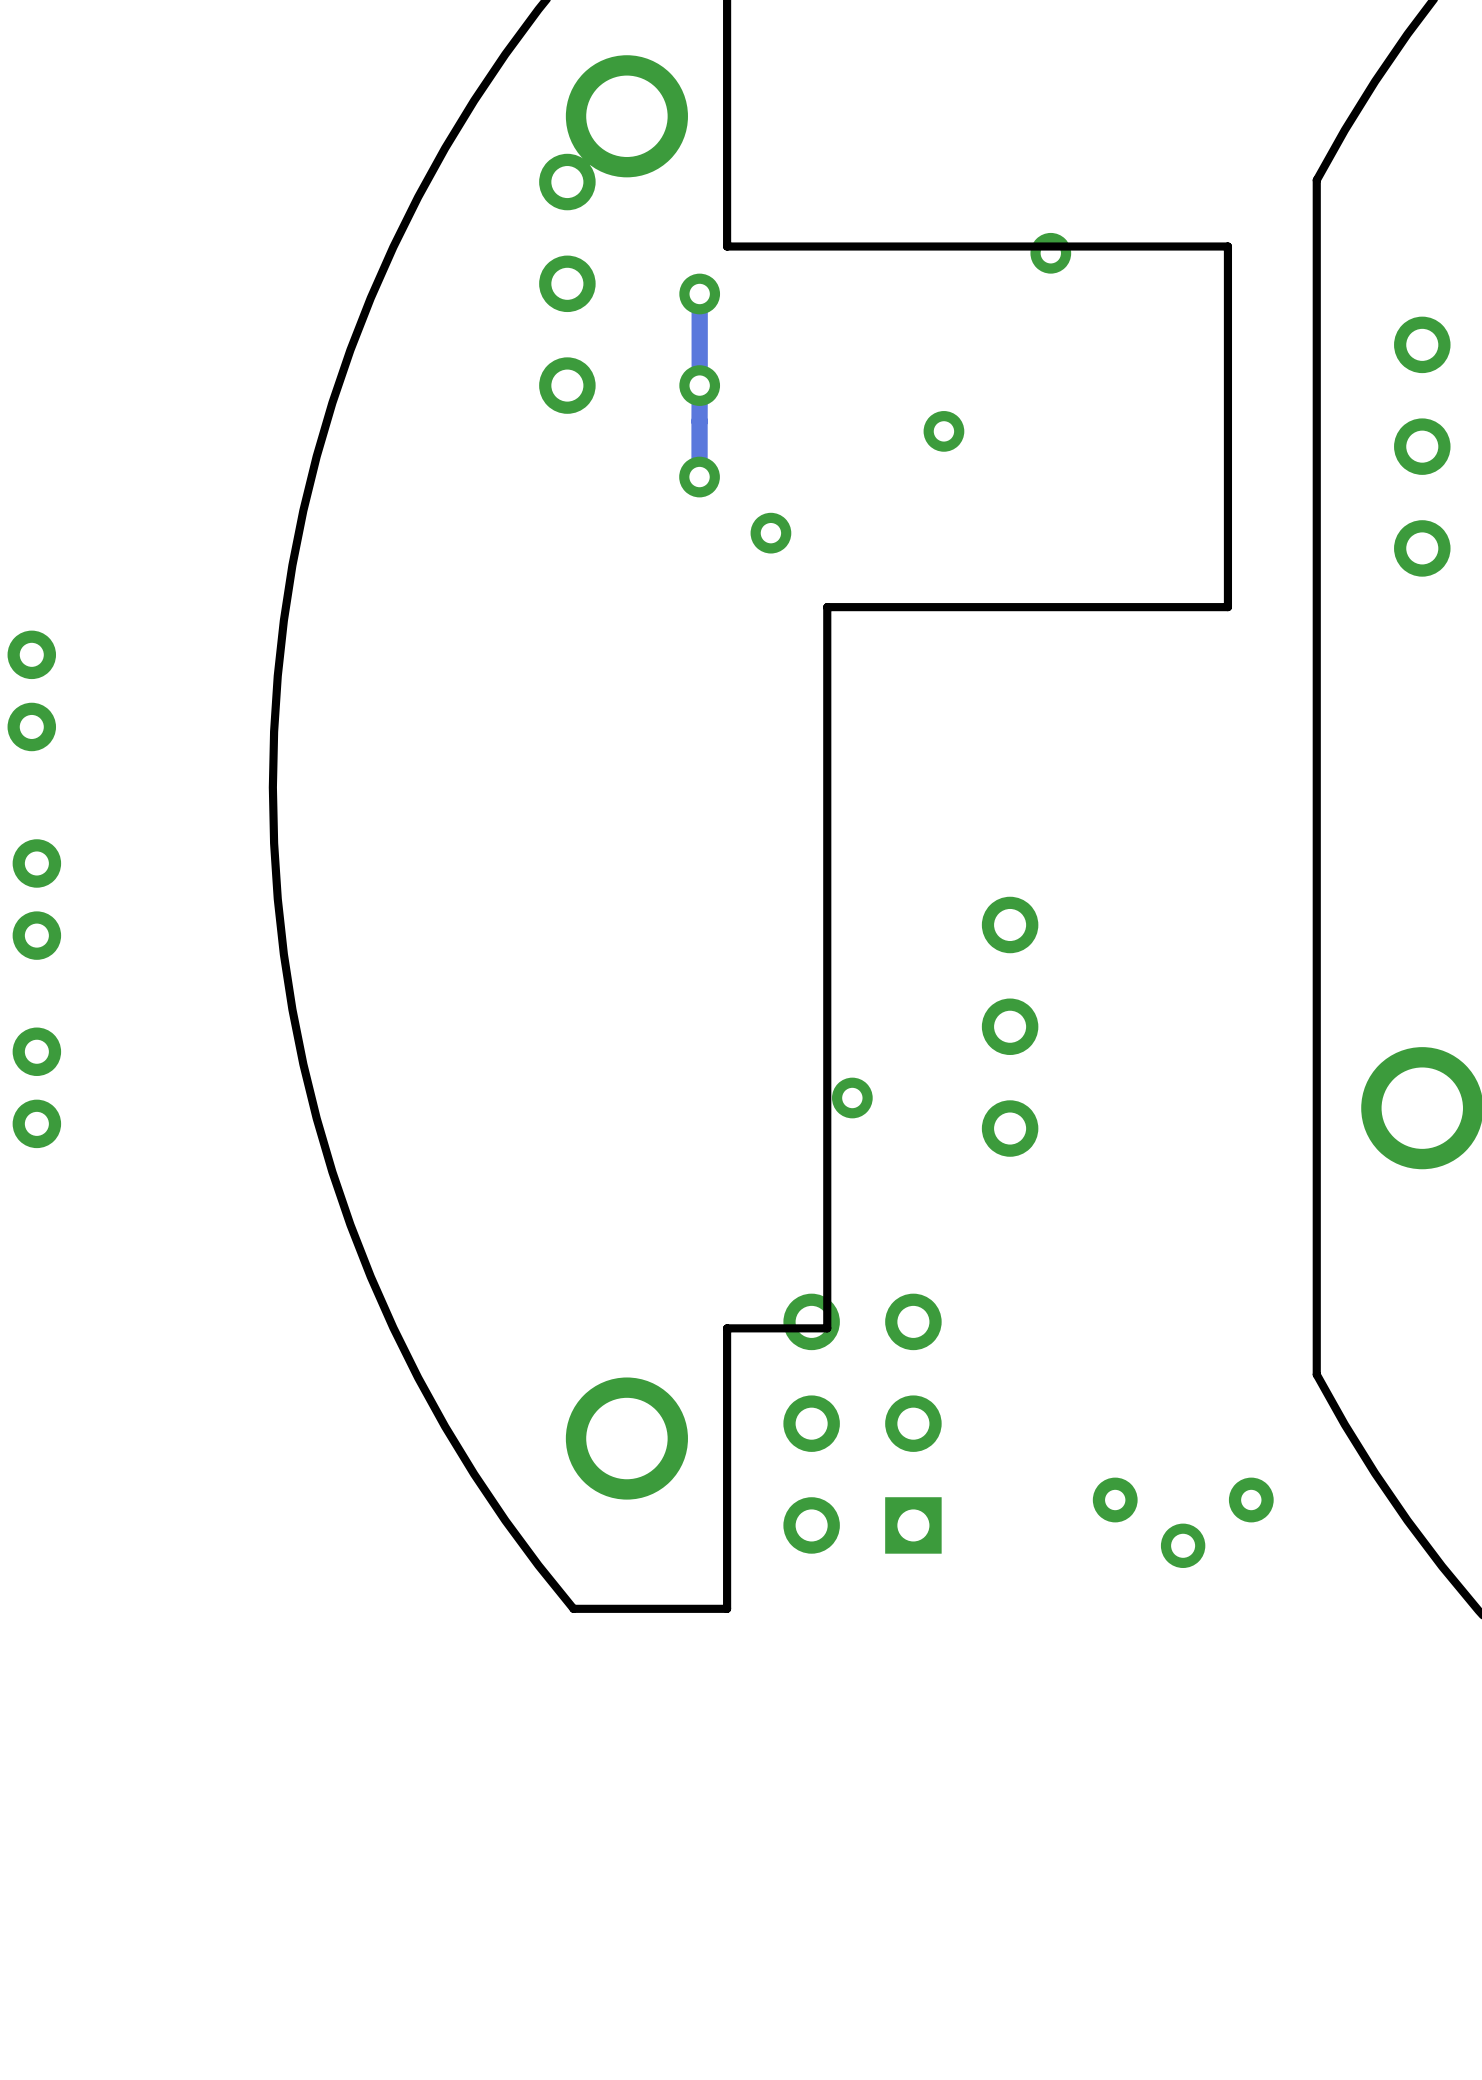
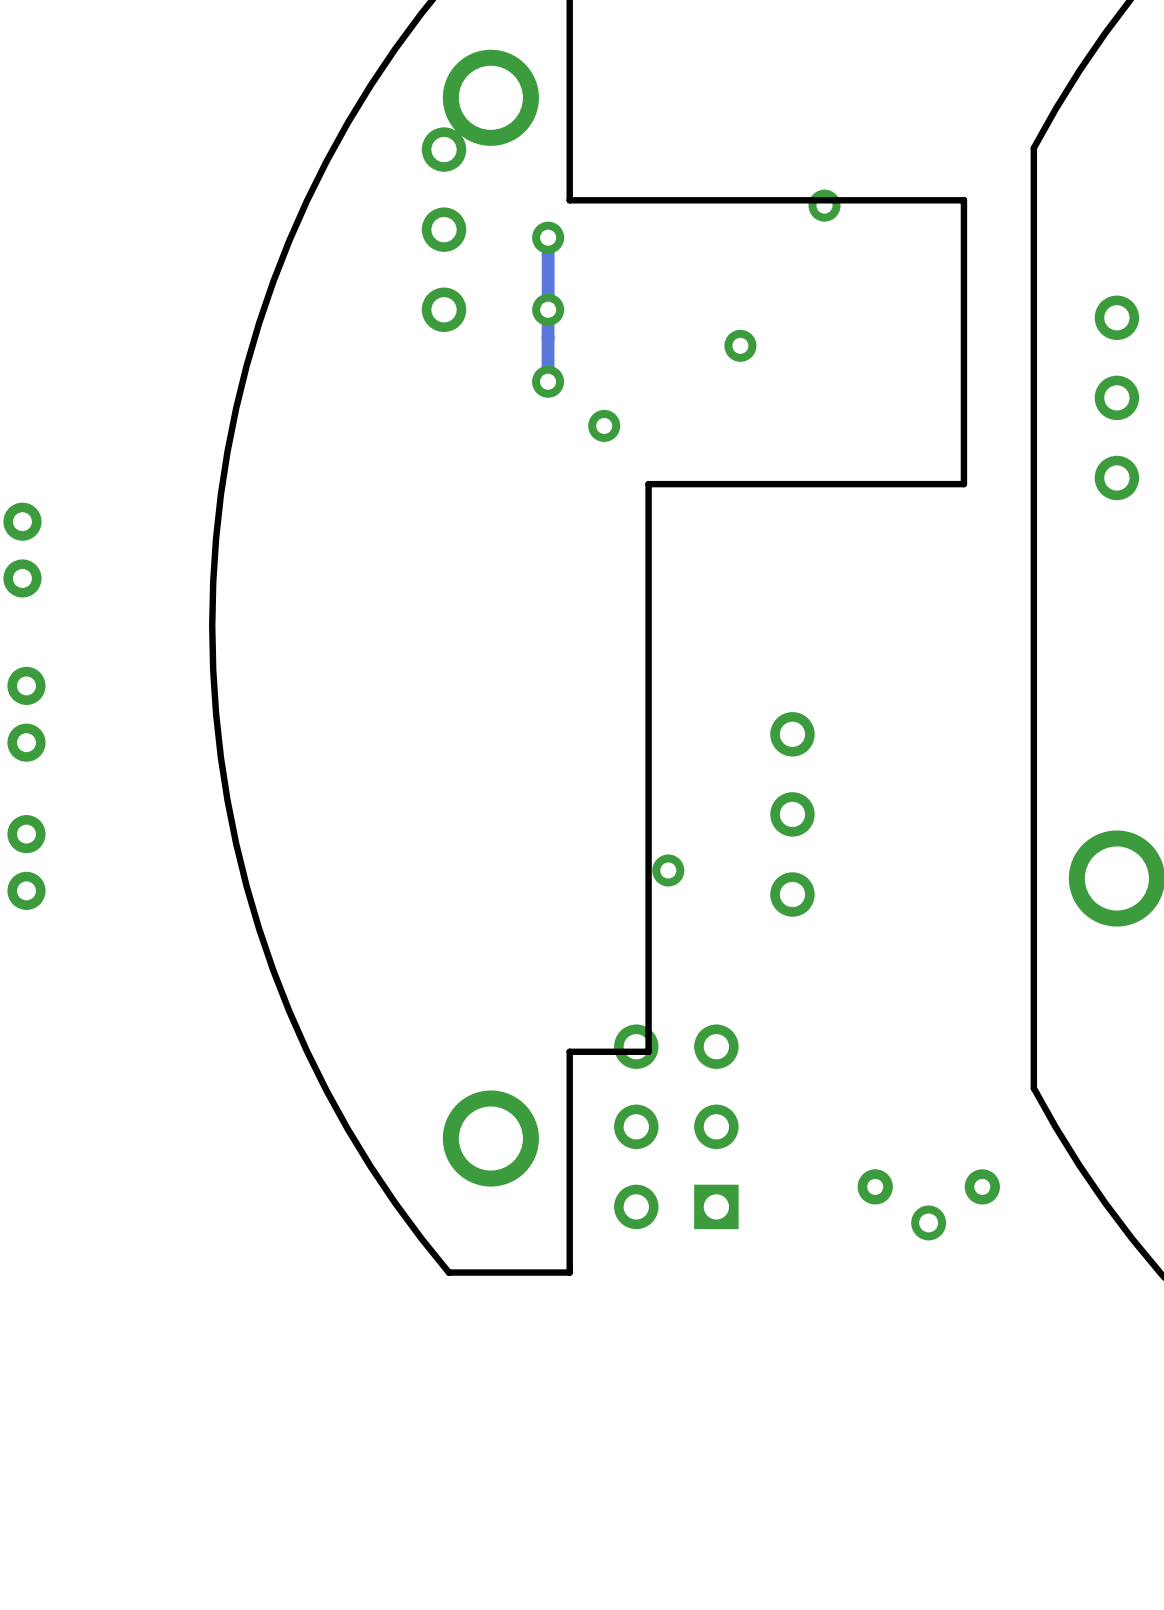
part position: (1422, 446) -> (1116, 397)

